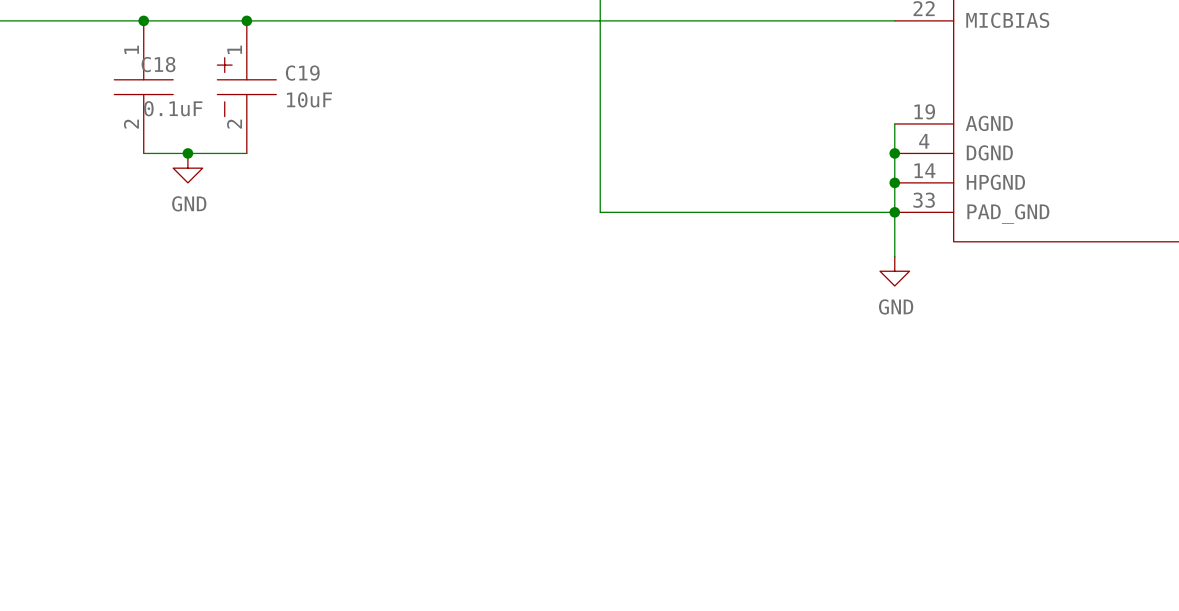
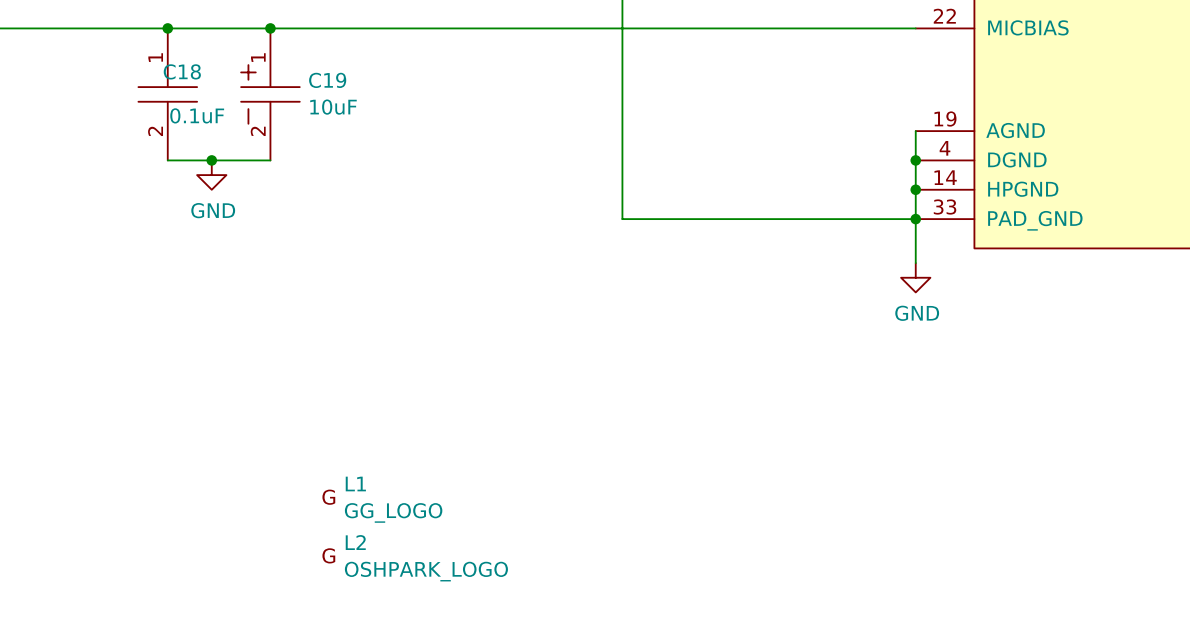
L1: none -> GG_LOGO (382, 499)
L2: none -> OSHPARK_LOGO (415, 558)

